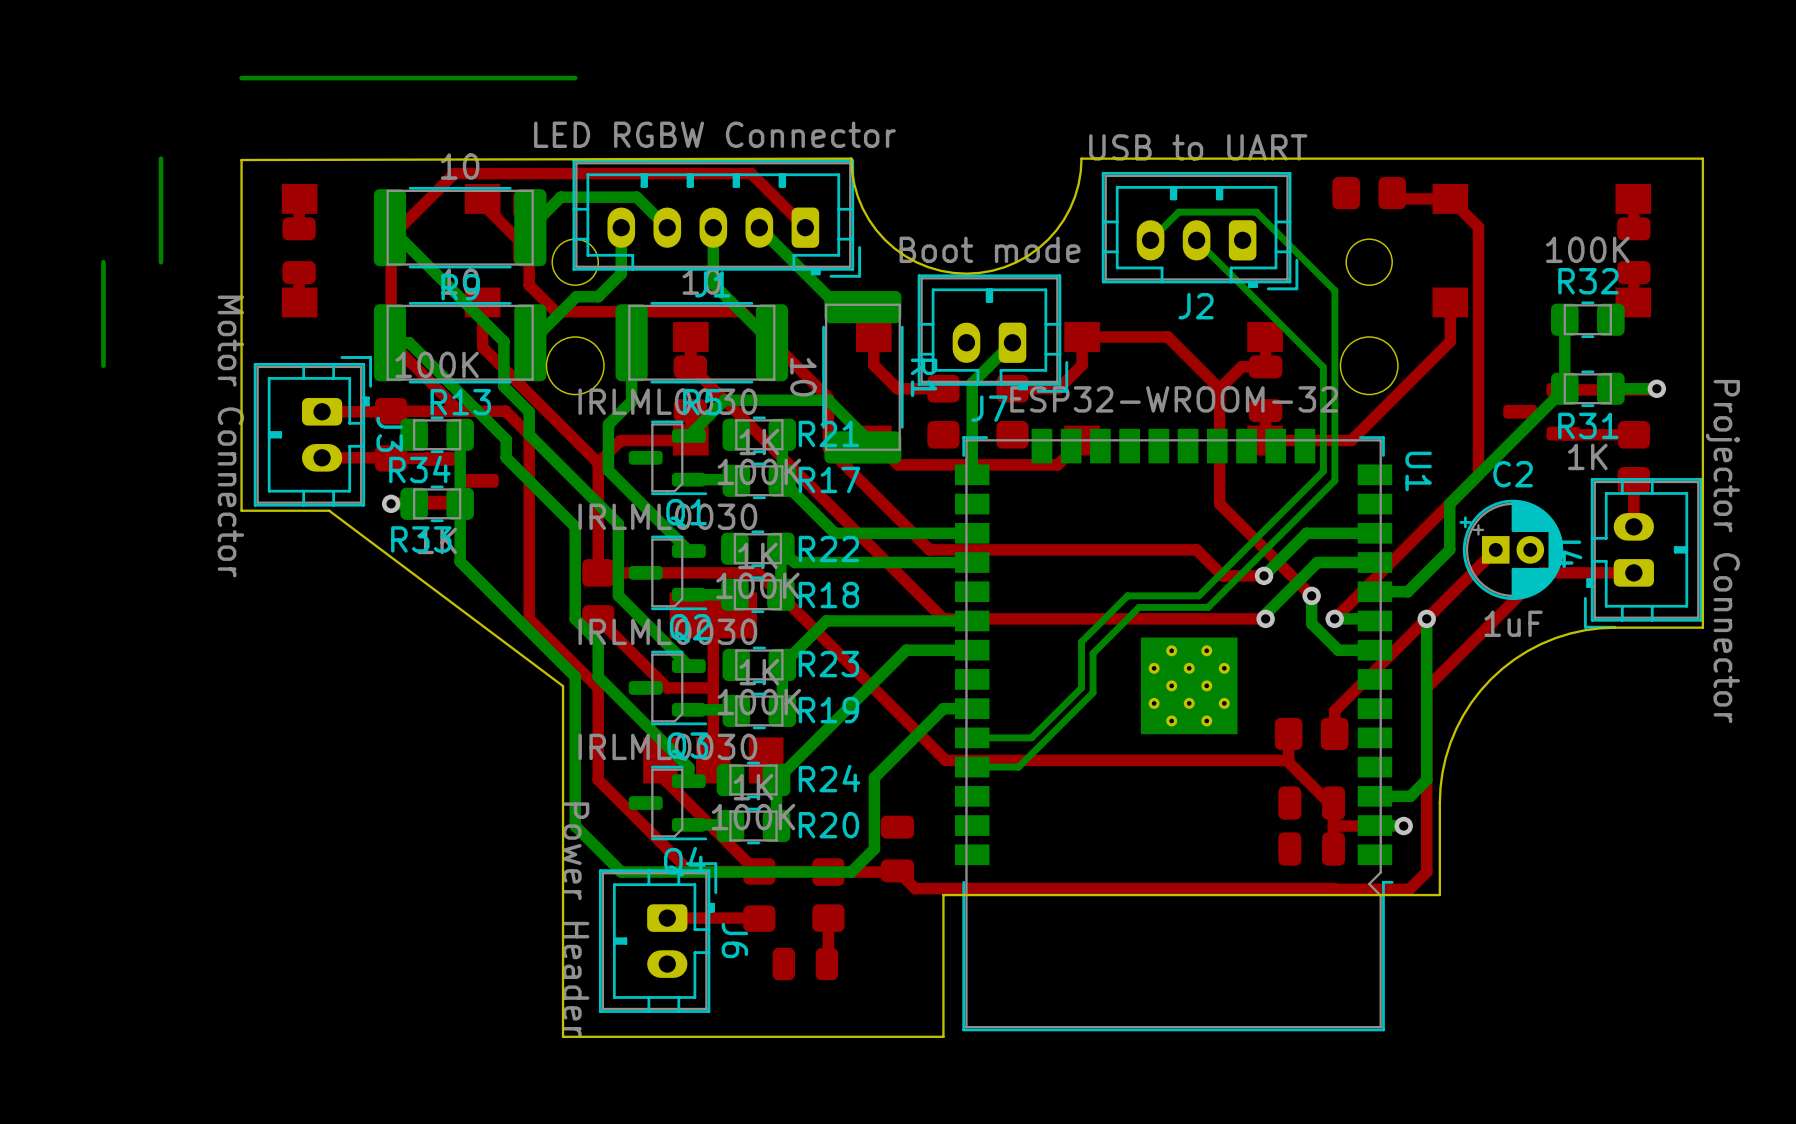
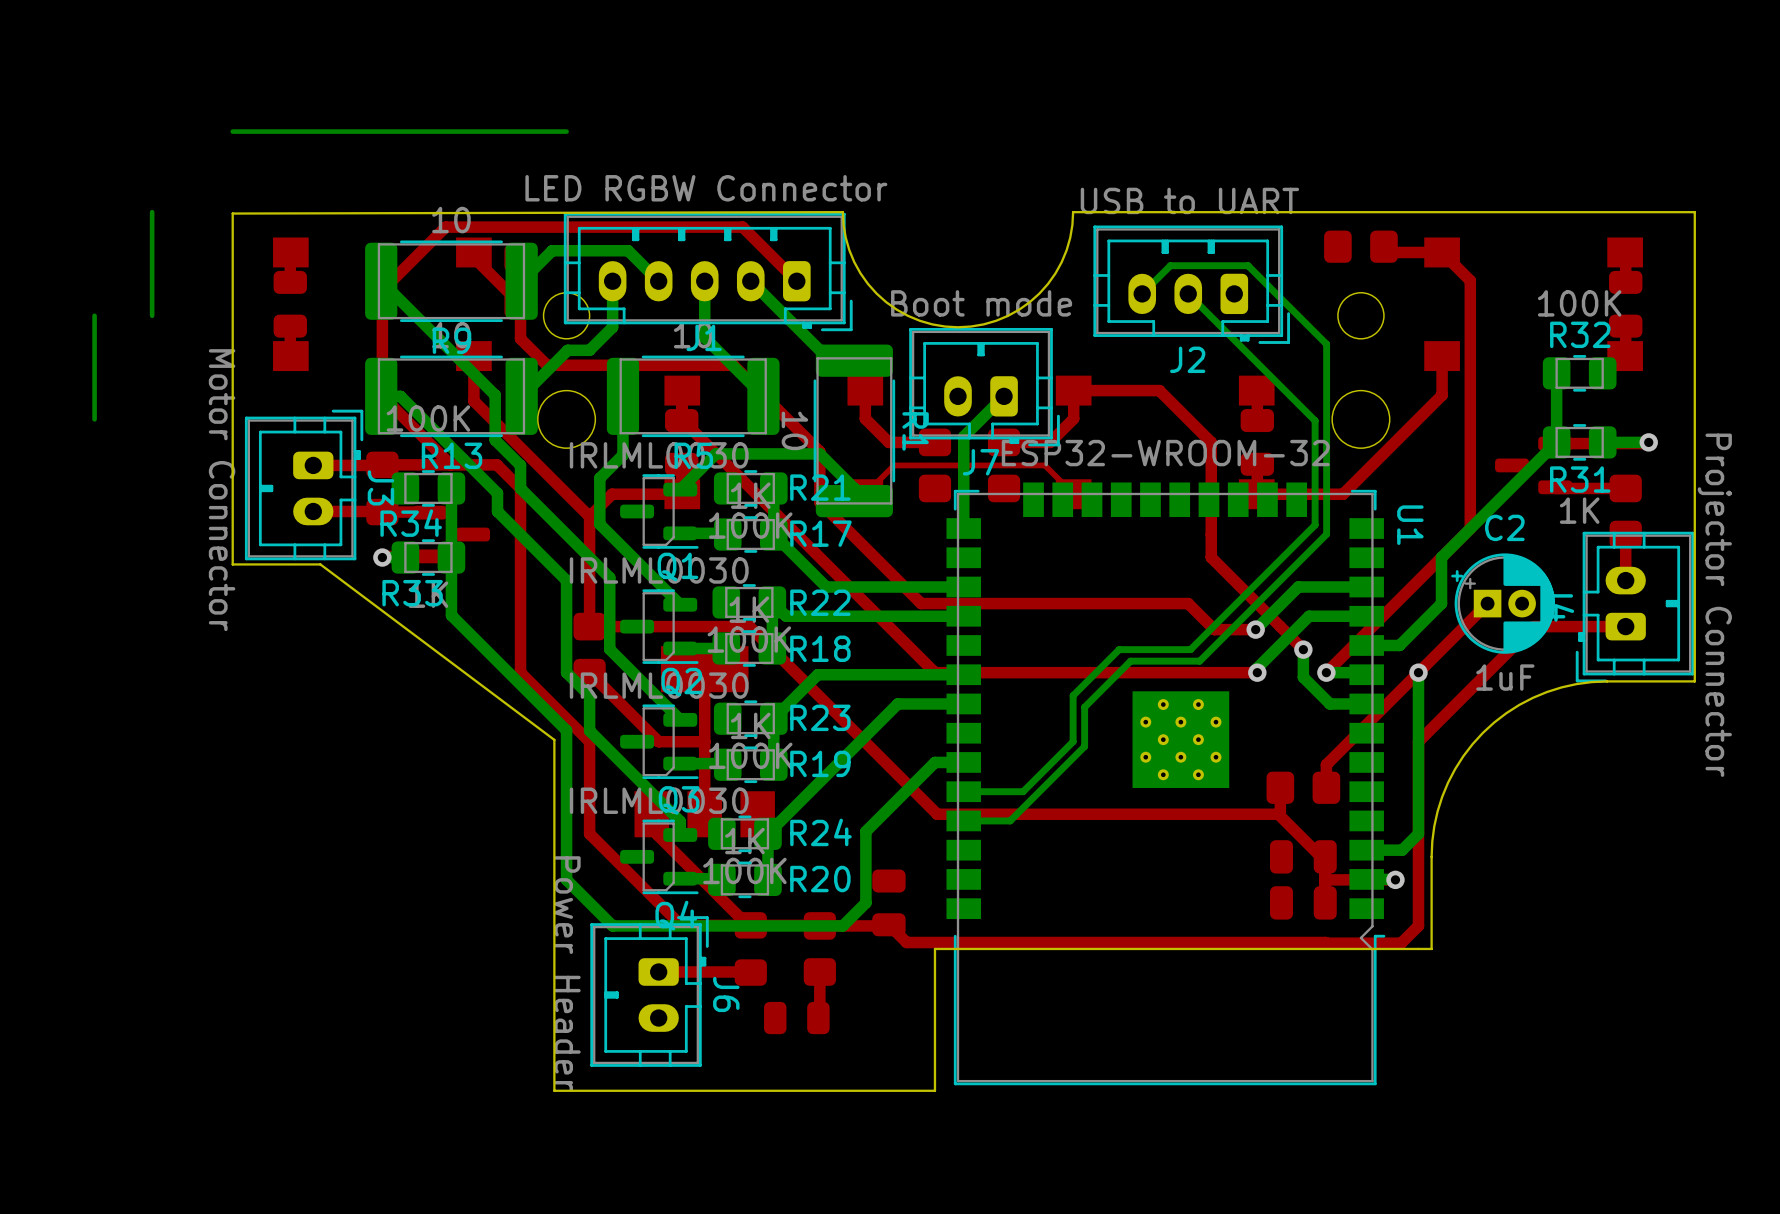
top track: (1265, 366) (1241, 366) (1219, 388) -> none
top track: (1082, 440) (1057, 464) (898, 464) (873, 440) -> (1073, 494) (1044, 465) (894, 465) (865, 494)

